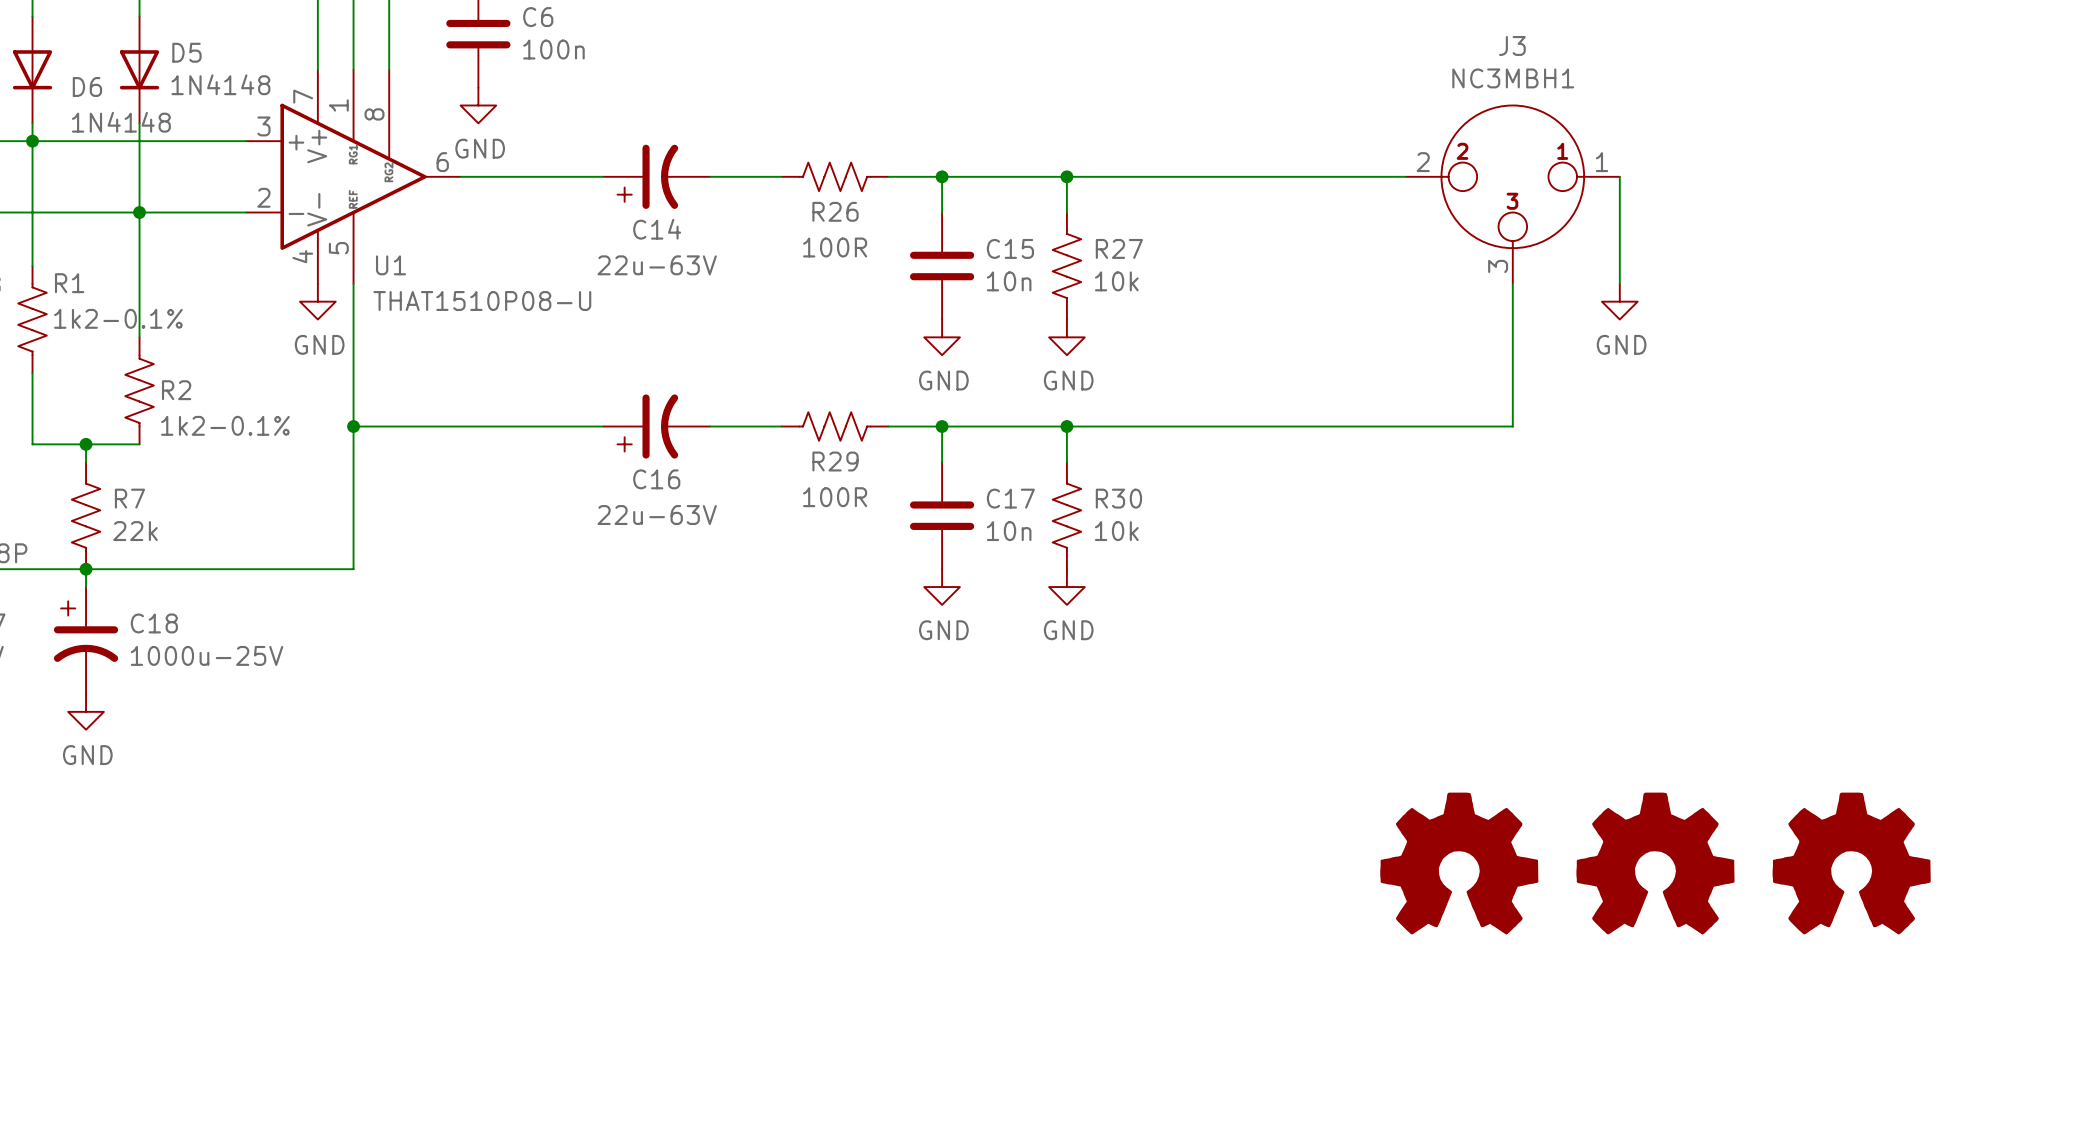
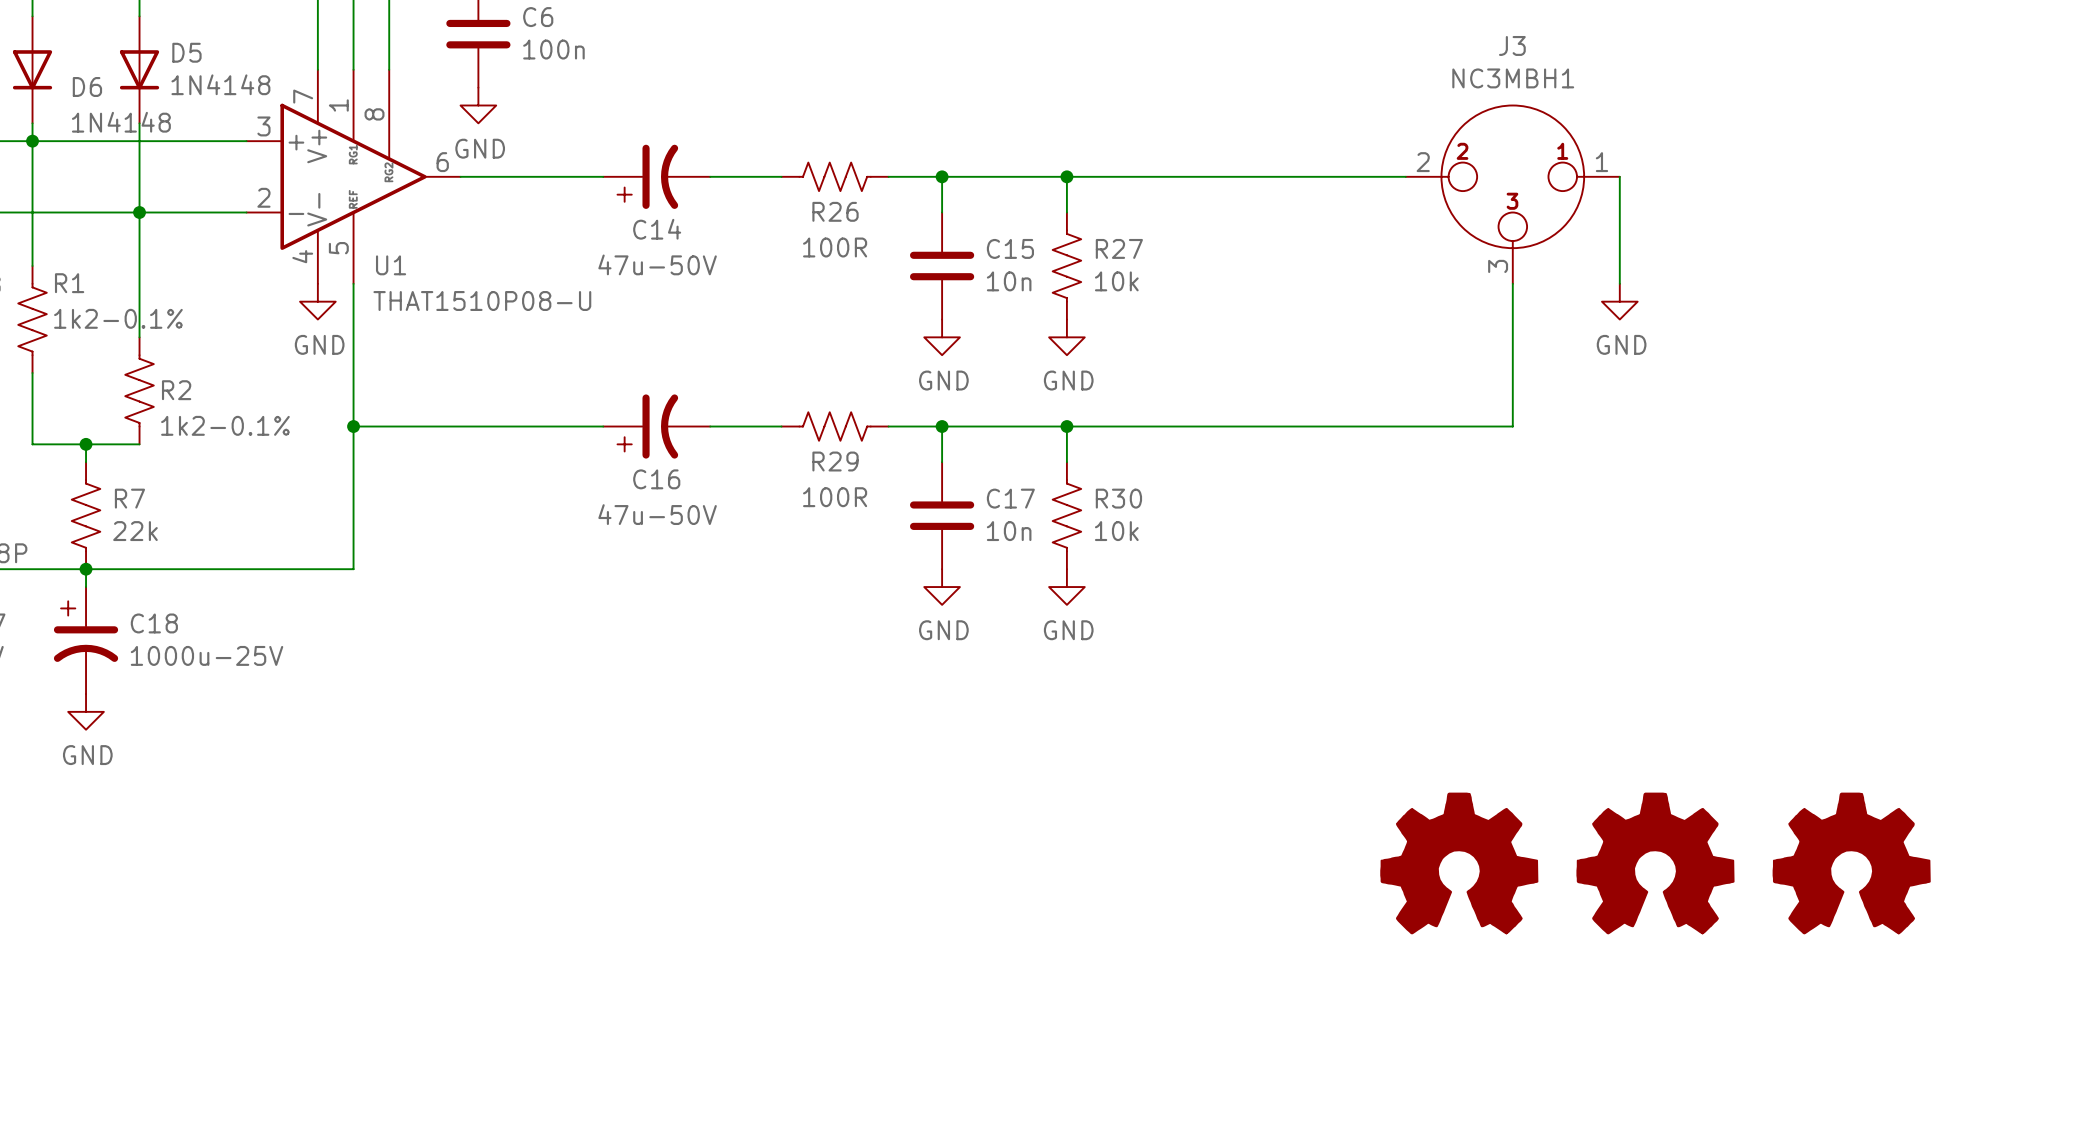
C14 value: 22u-63V (657, 265) -> 47u-50V (657, 264)
C16 value: 22u-63V (657, 515) -> 47u-50V (657, 514)

